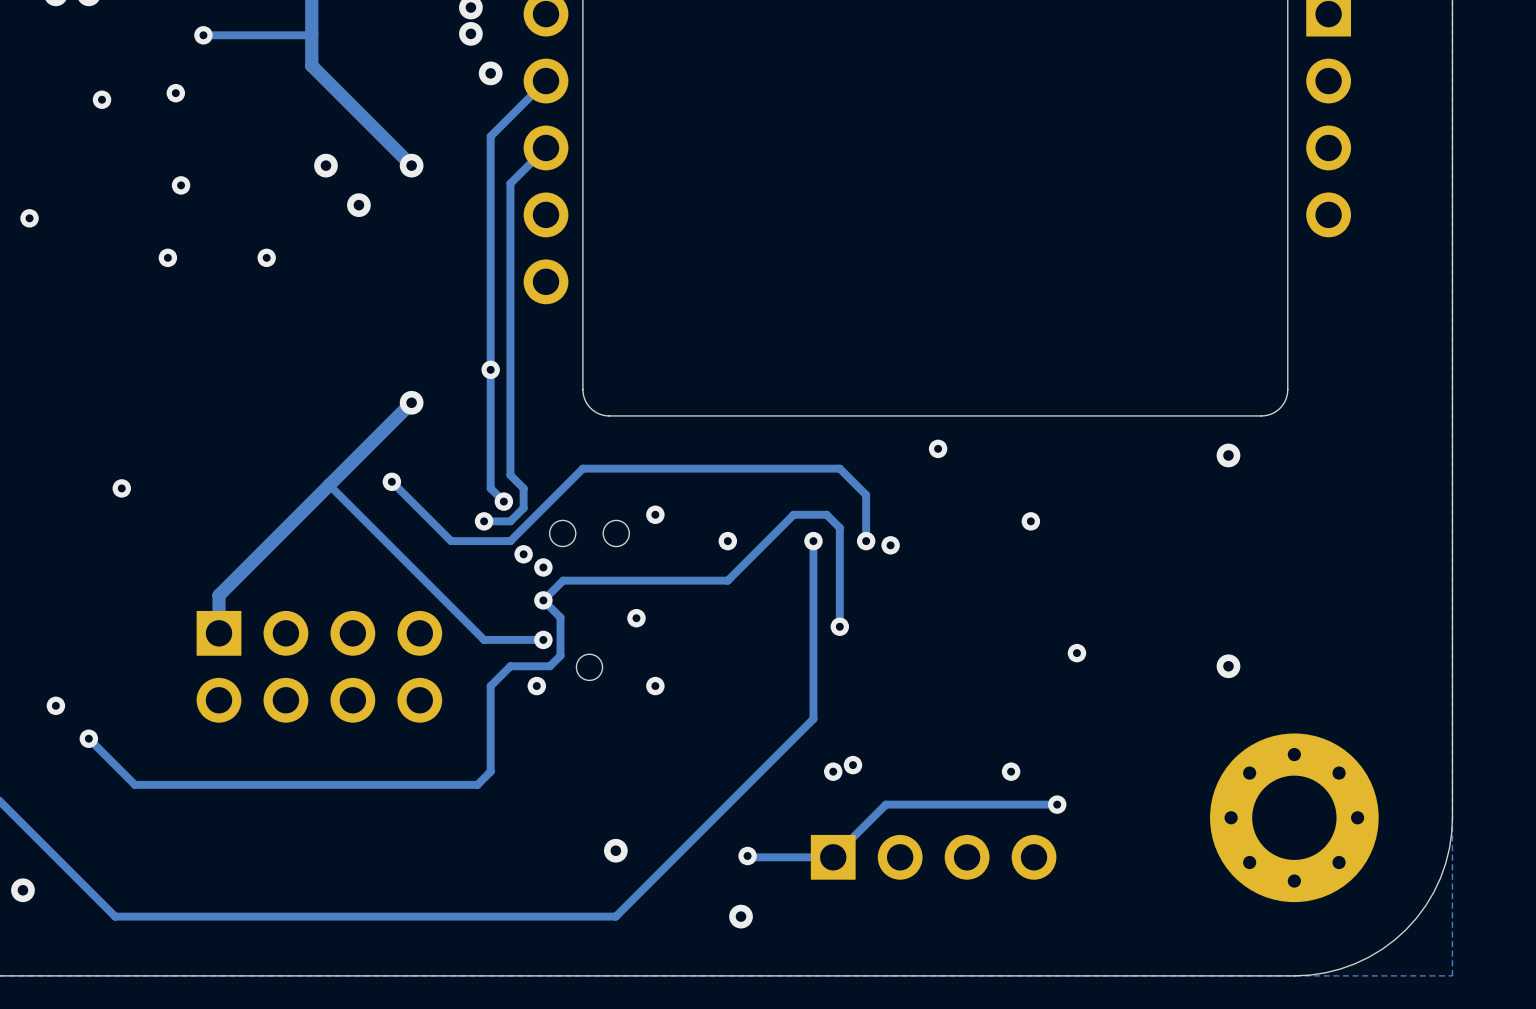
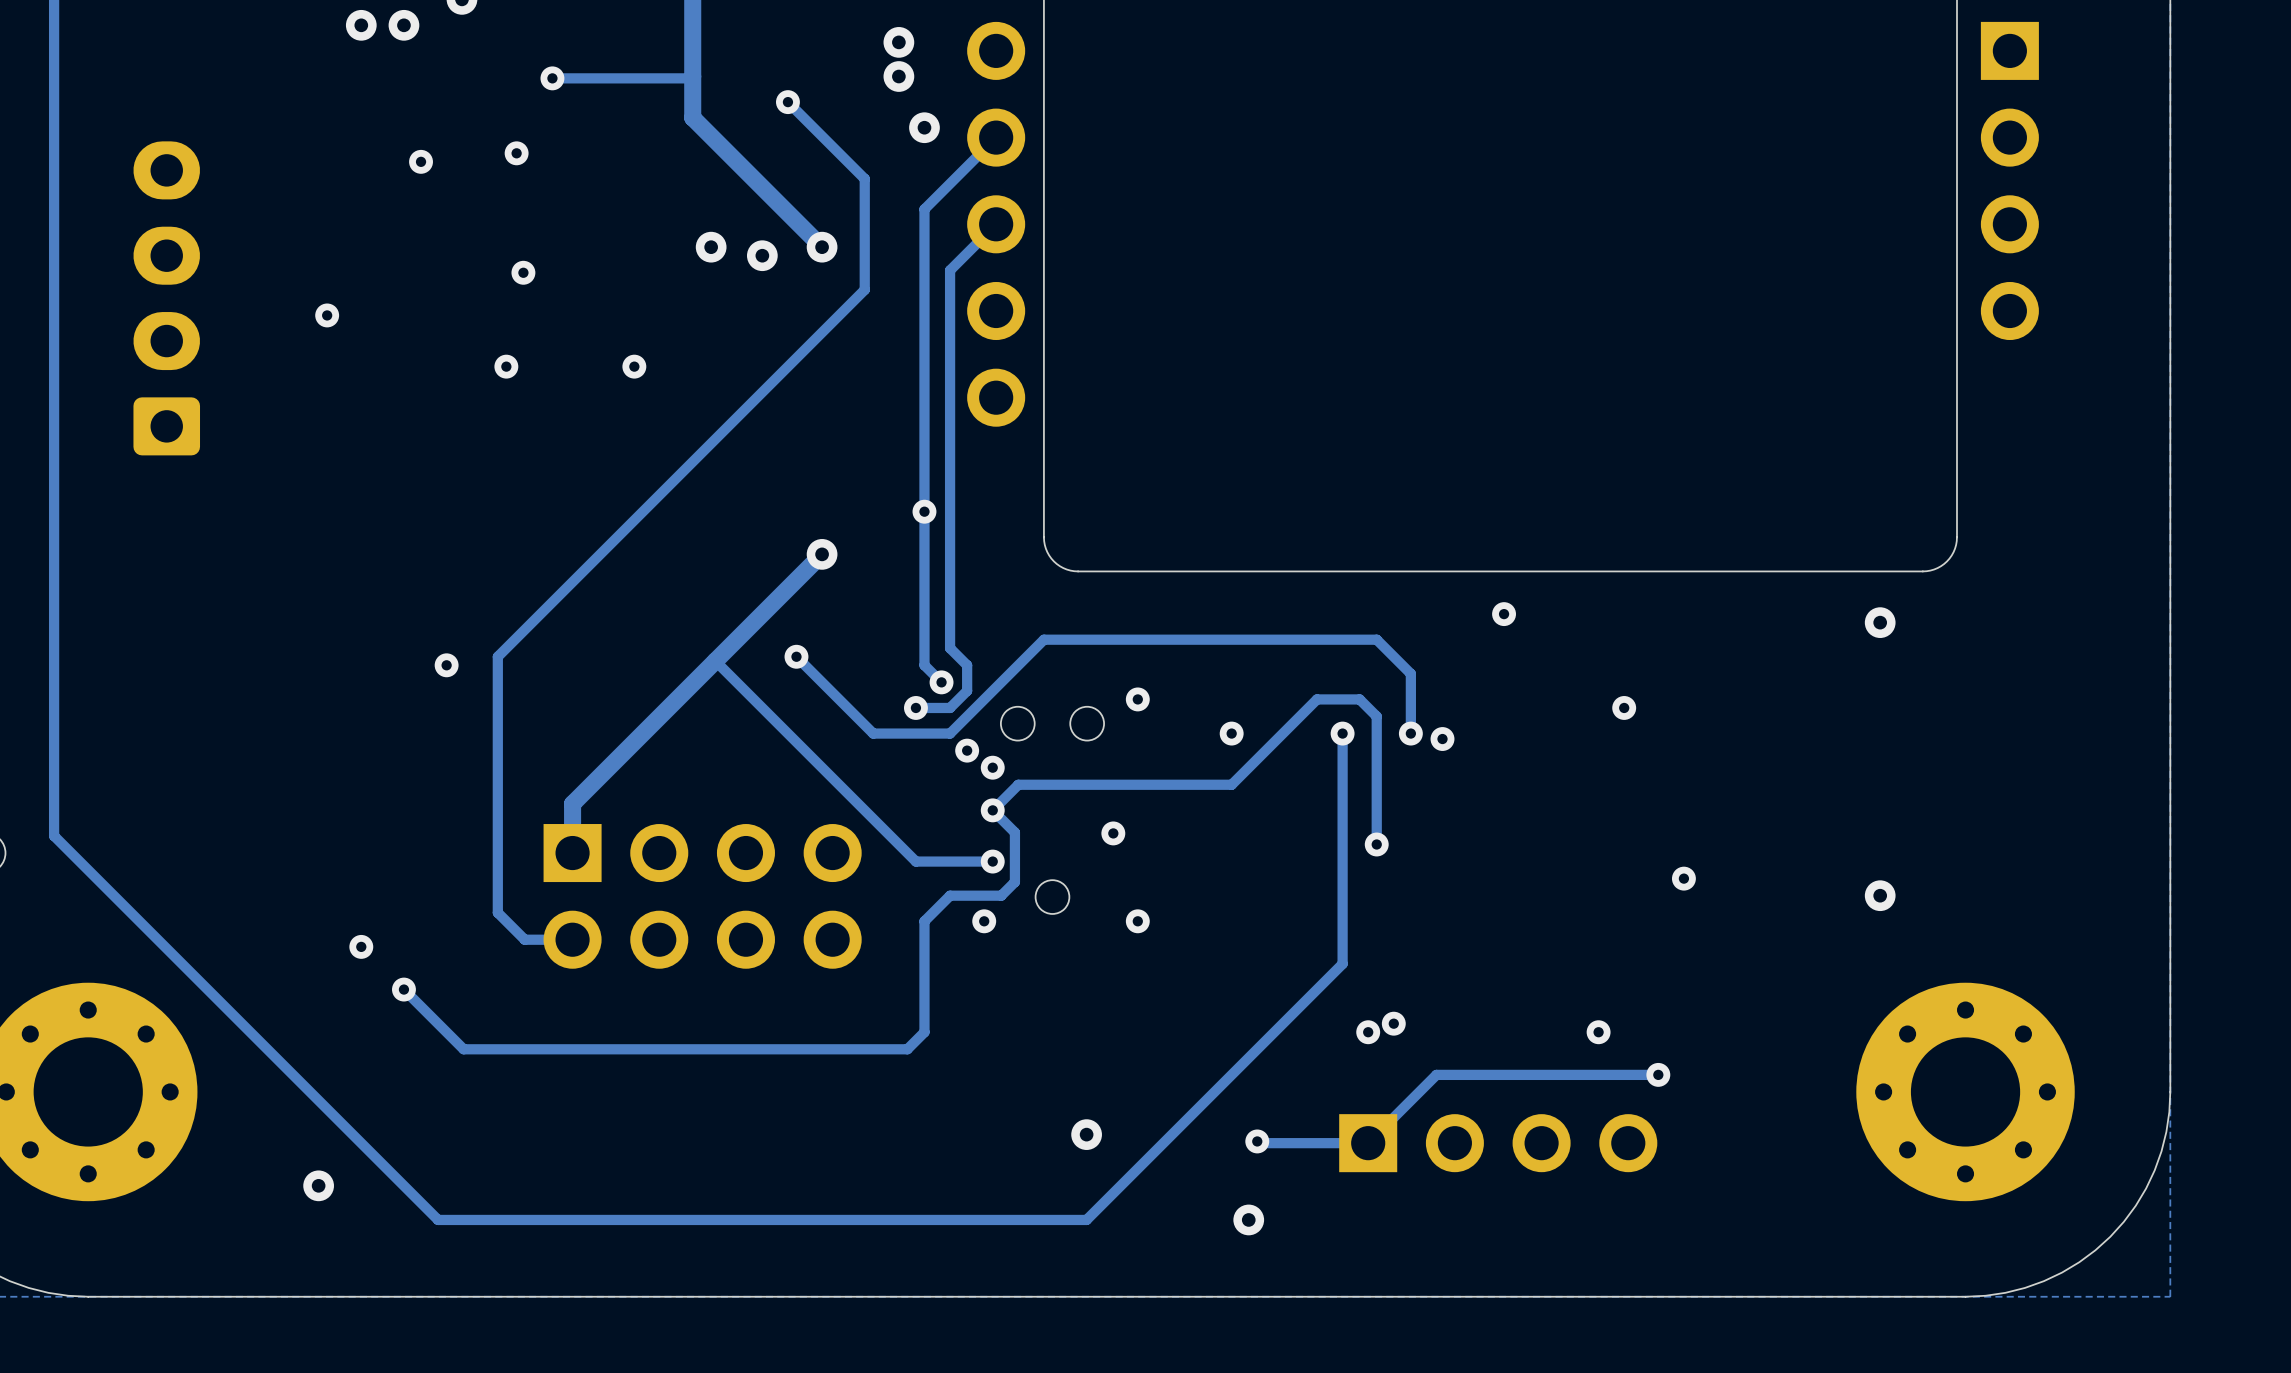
track: none -> (787, 102) (864, 178) (864, 289) (497, 656) (497, 912) (524, 939) (572, 939)
via: none -> (787, 102)
via position: (358, 205) -> (762, 255)

